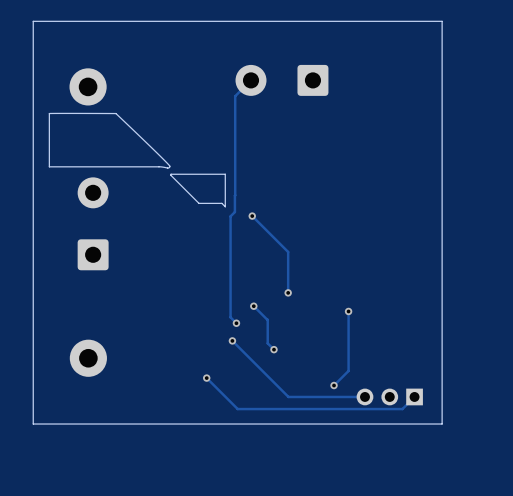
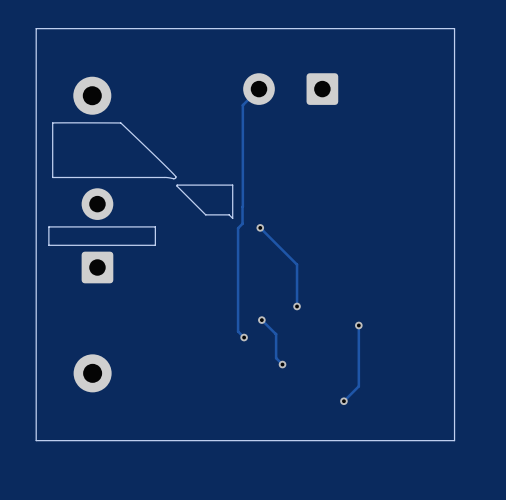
board edge: none -> (155, 226) (48, 226) (48, 245) (155, 245) (155, 226)
track: (232, 340) (288, 396) (364, 396) -> none
via: (232, 340) -> none
track: (206, 378) (237, 409) (402, 409) (414, 396) -> none
via: (206, 378) -> none
part: (389, 396) -> none

